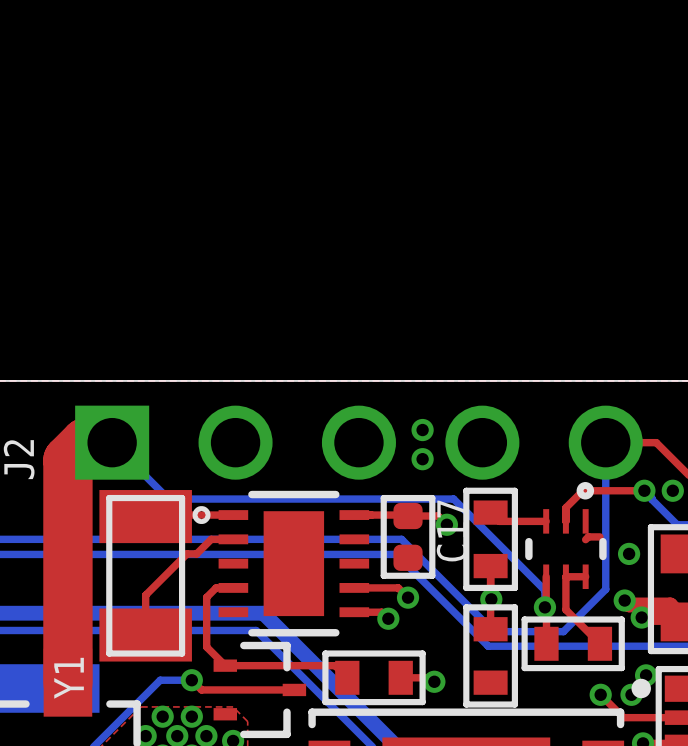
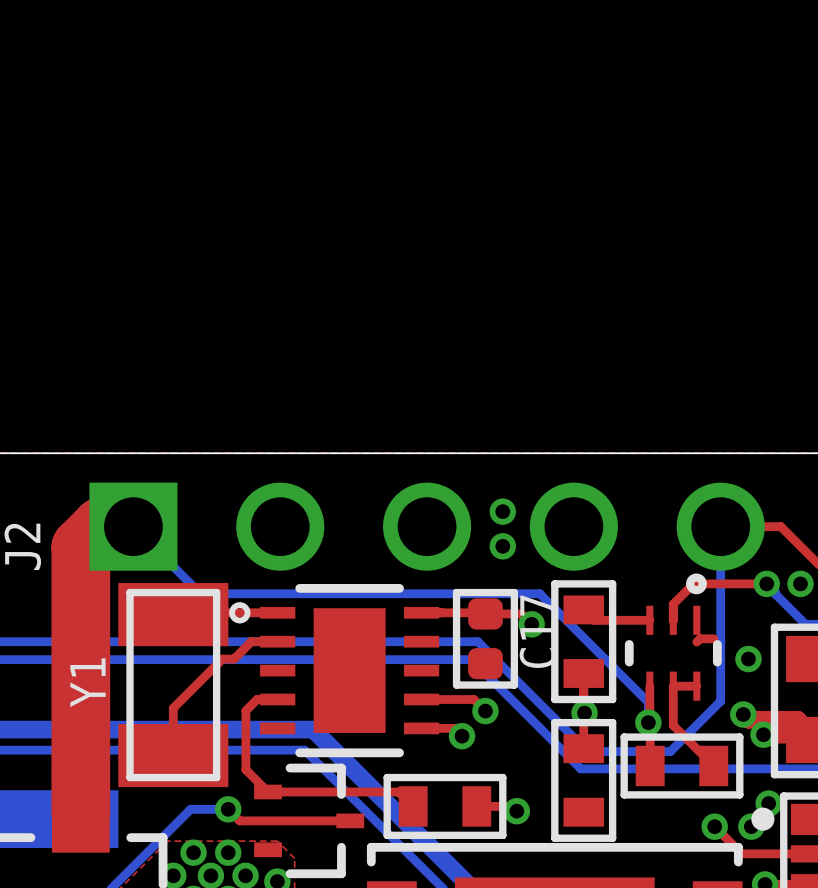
Y1 name position: Y1 (69, 678) -> Y1 (87, 682)

